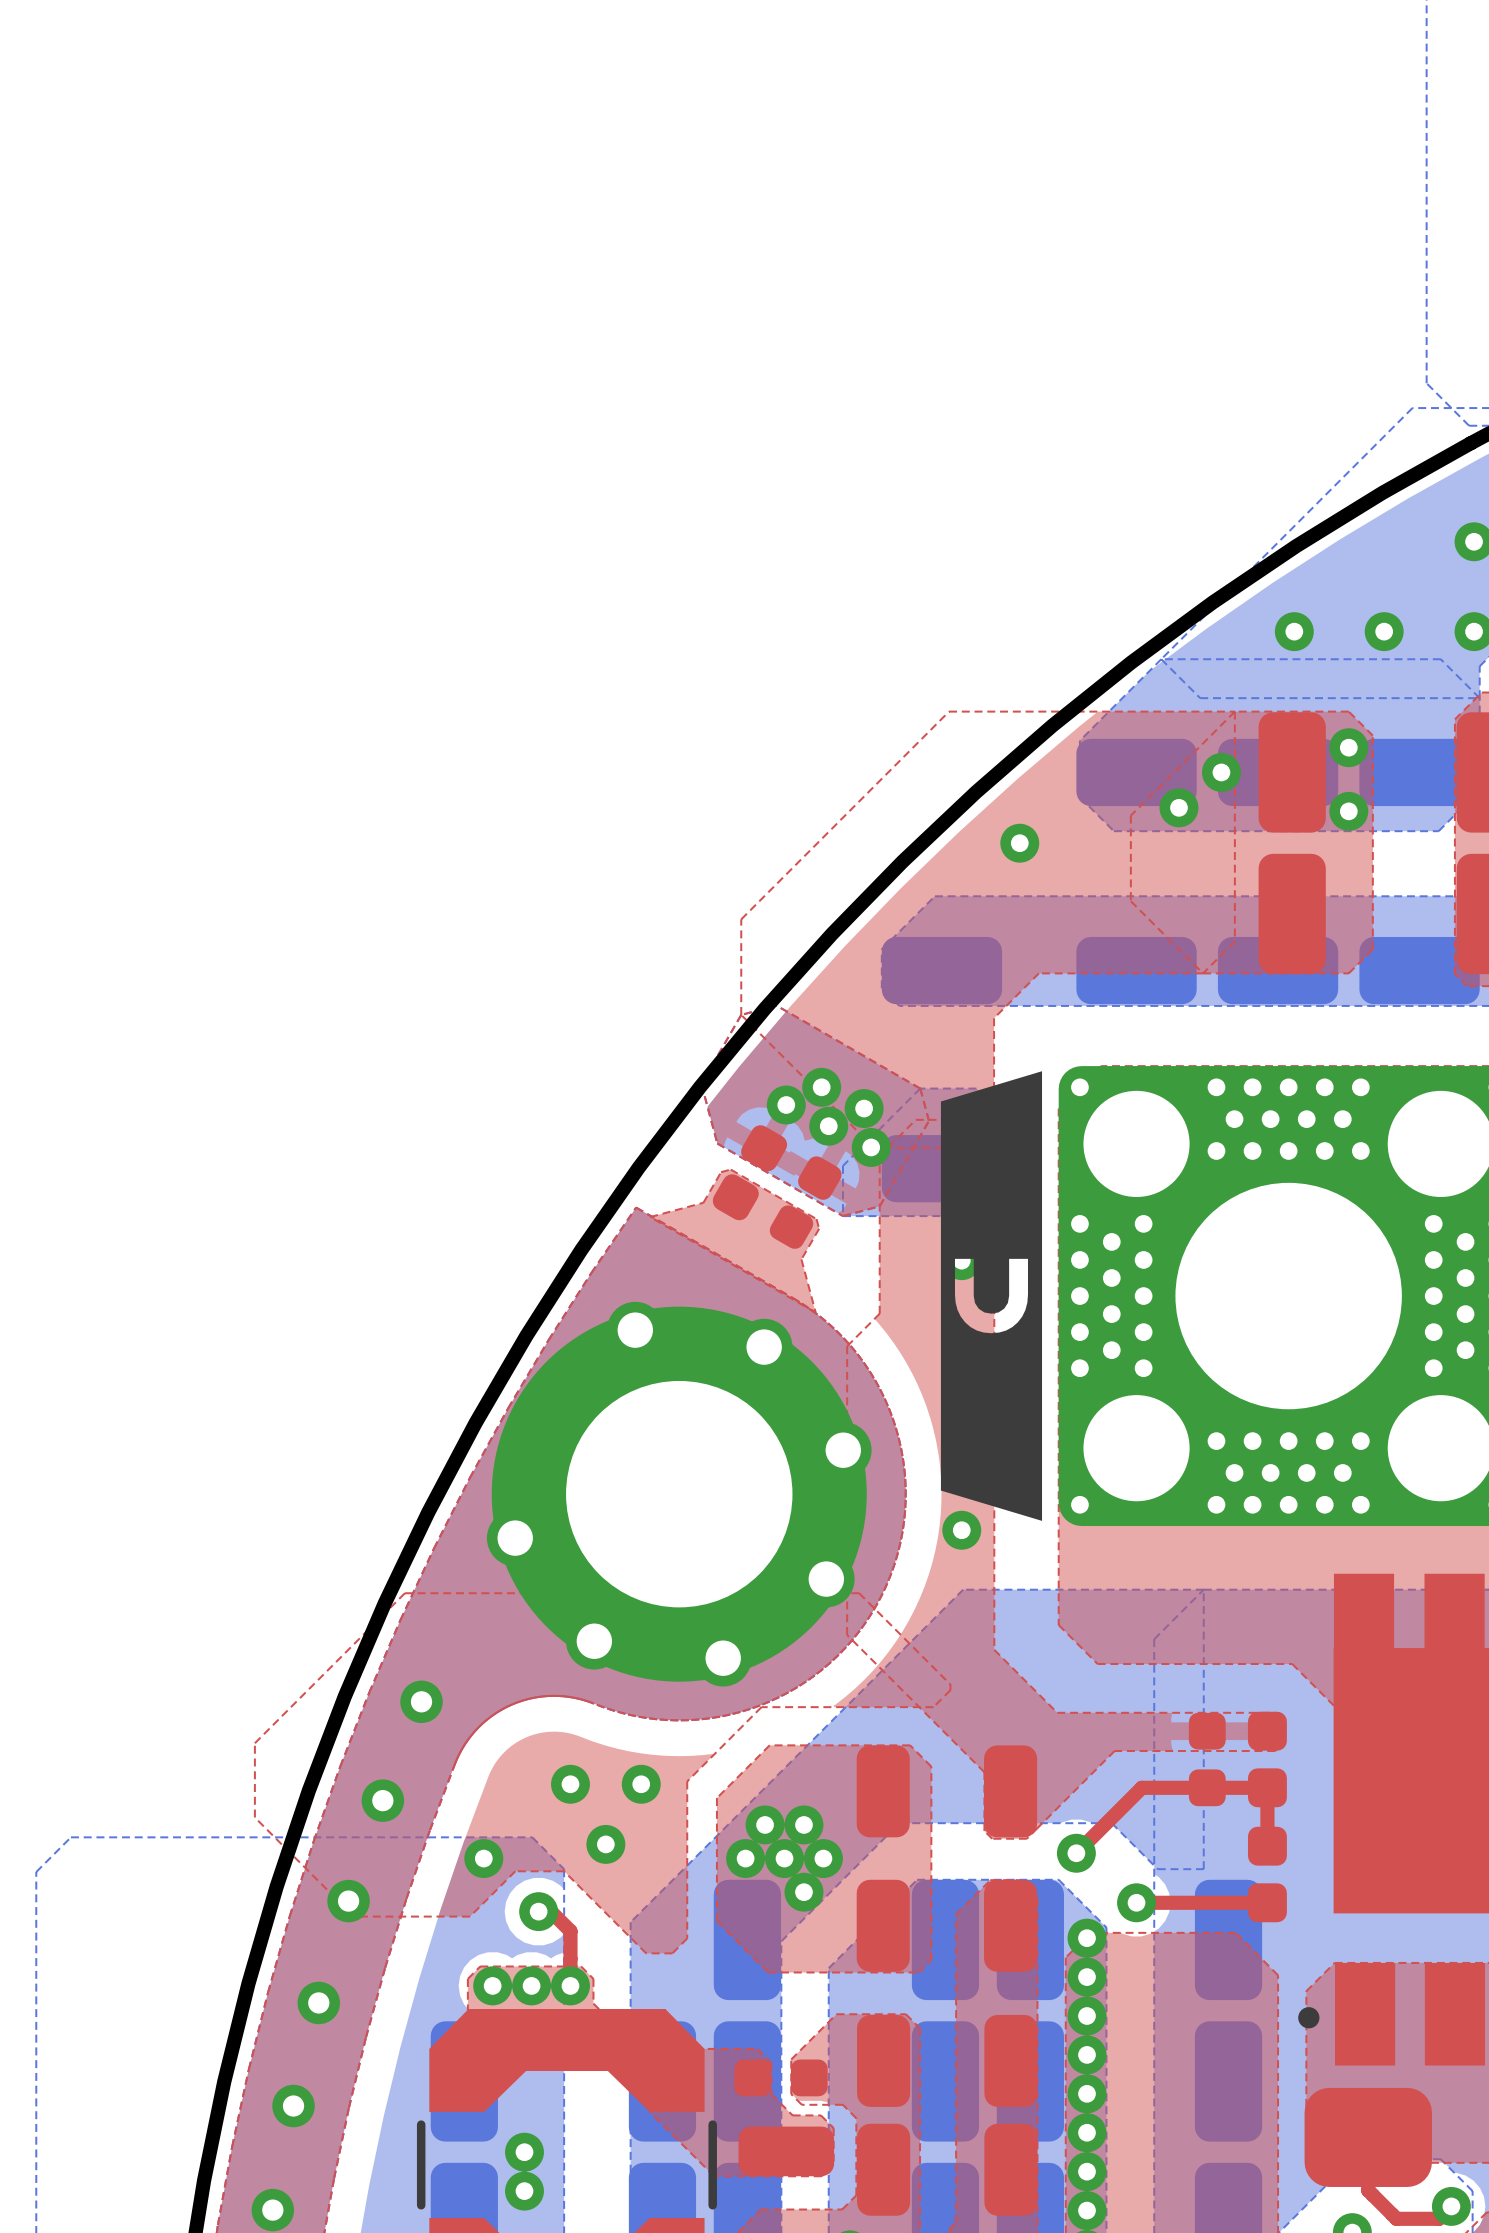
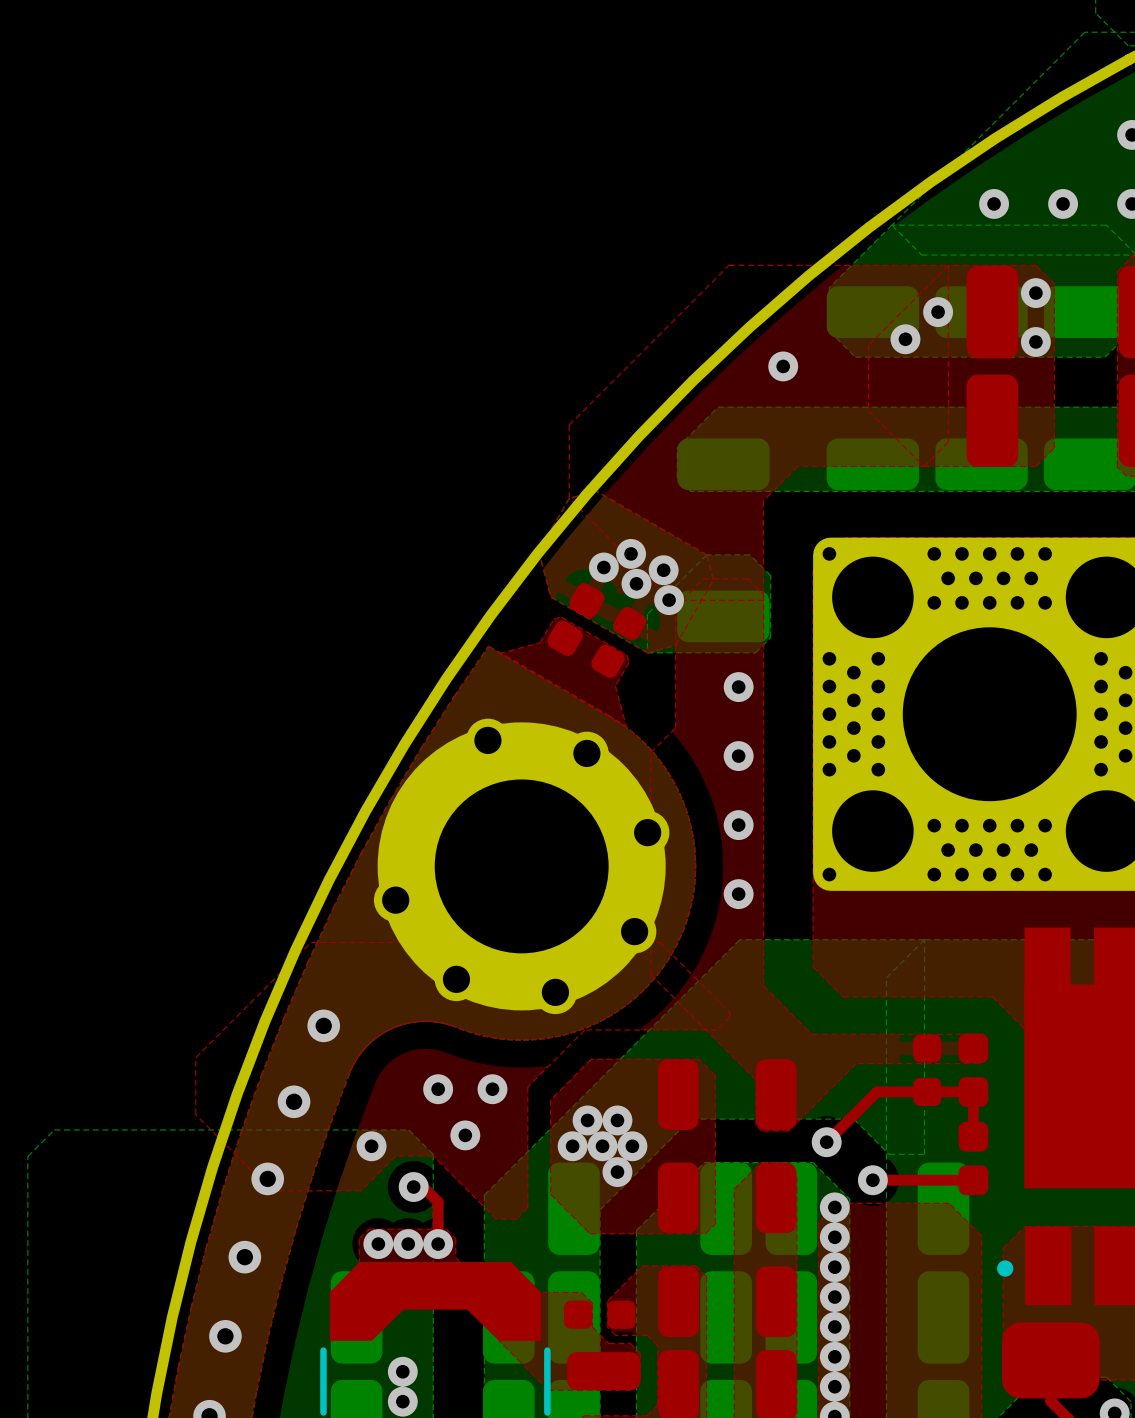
drawing: [940, 1071, 1043, 1521] -> none

